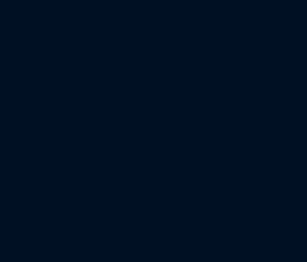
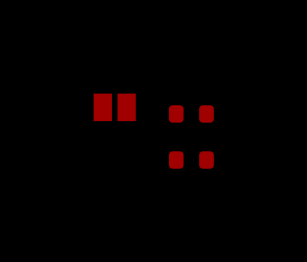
part: none -> (114, 107)
part: none -> (191, 113)
part: none -> (191, 160)

